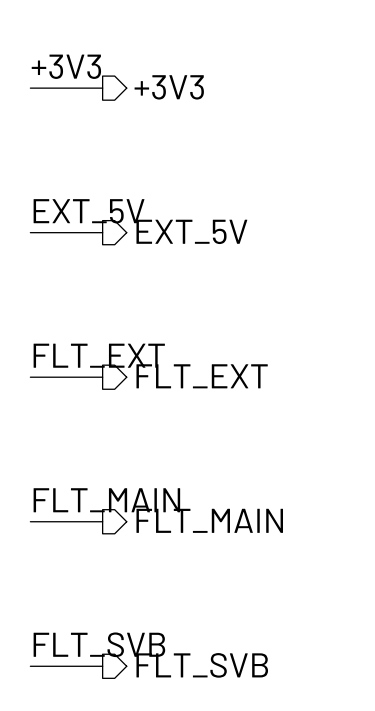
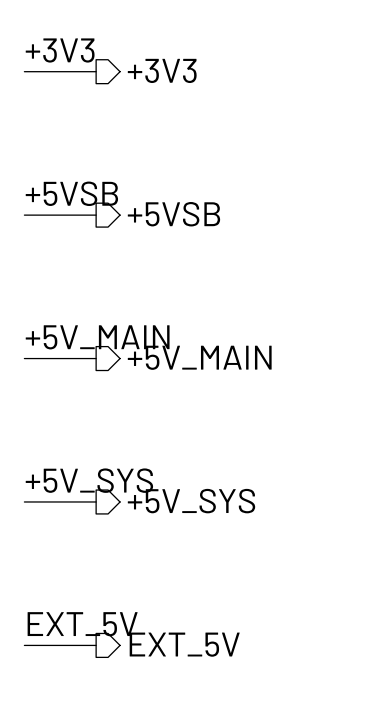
label: EXT_5V (89, 211) -> +5VSB (71, 193)
hierarchical label: EXT_5V (191, 231) -> +5VSB (173, 214)
label: FLT_EXT (99, 355) -> +5V_MAIN (97, 337)
hierarchical label: FLT_EXT (202, 376) -> +5V_MAIN (199, 357)
label: FLT_MAIN (106, 500) -> +5V_SYS (89, 480)
hierarchical label: FLT_MAIN (209, 520) -> +5V_SYS (191, 501)
label: FLT_SVB (99, 644) -> EXT_5V (82, 624)
hierarchical label: FLT_SVB (202, 665) -> EXT_5V (184, 644)

